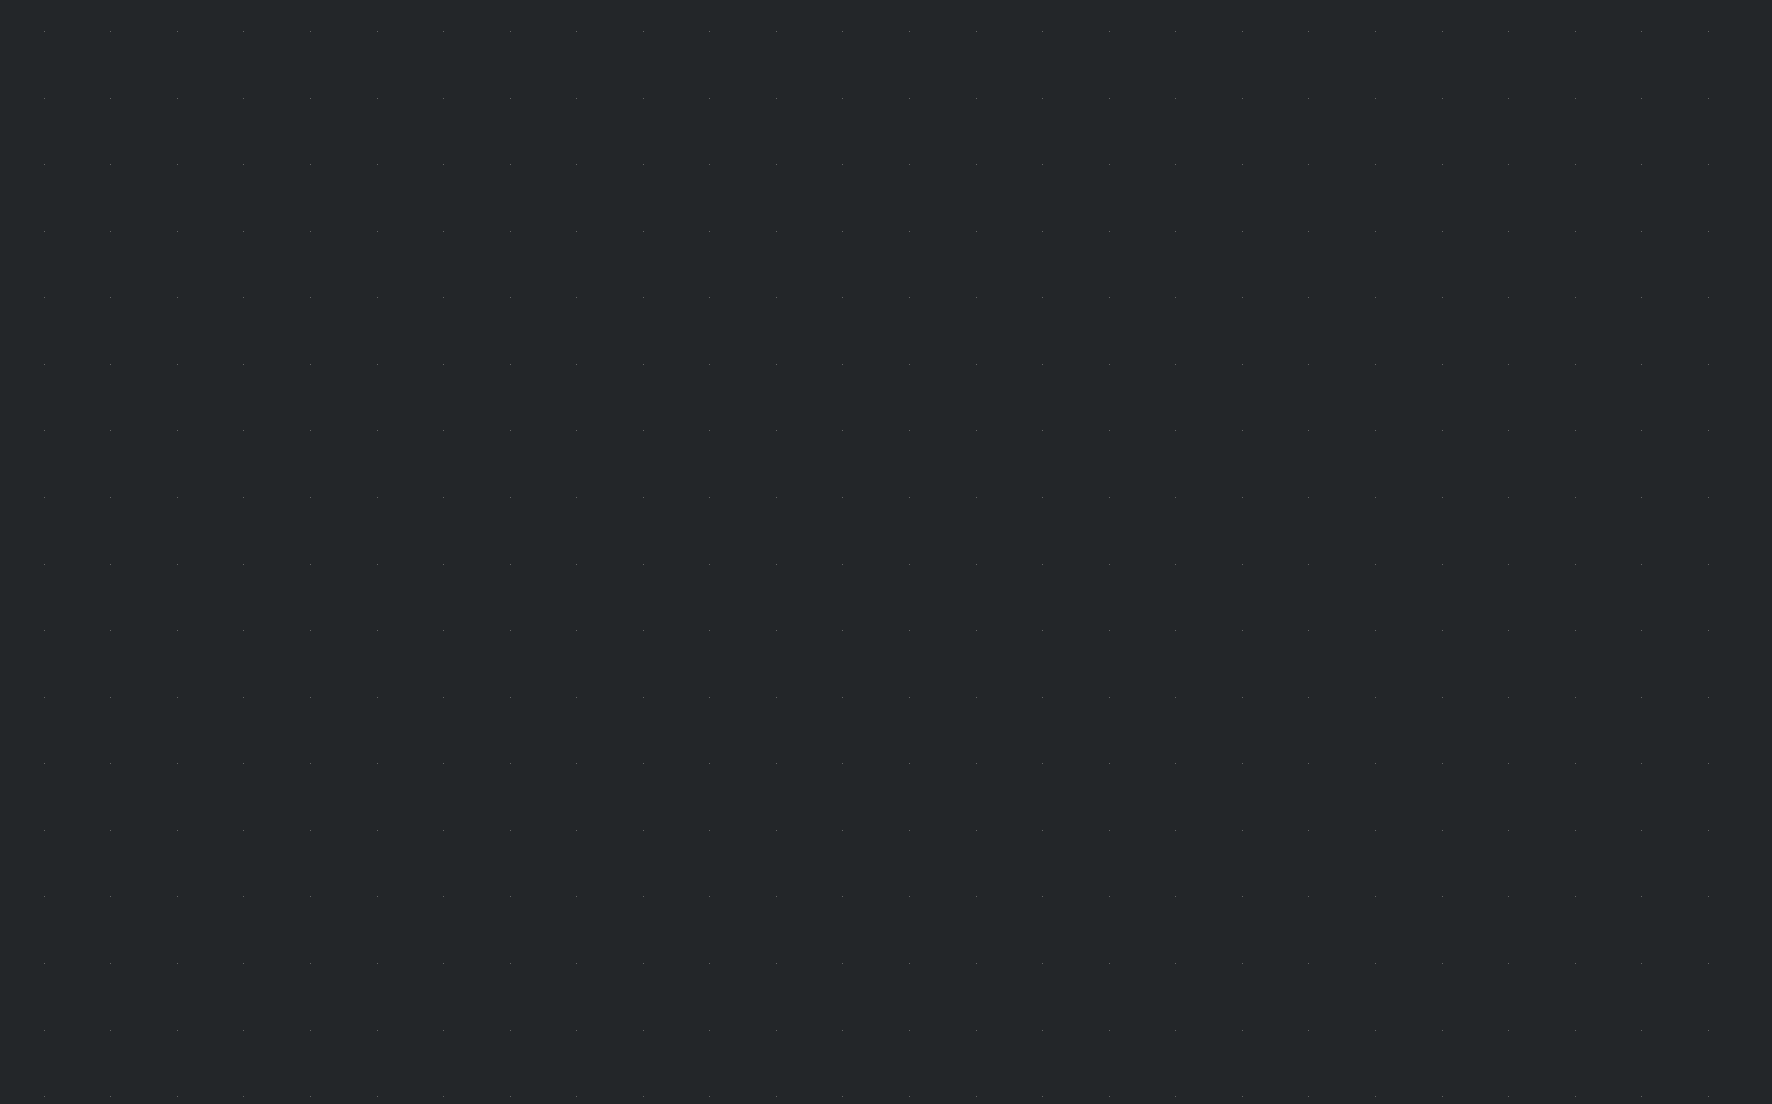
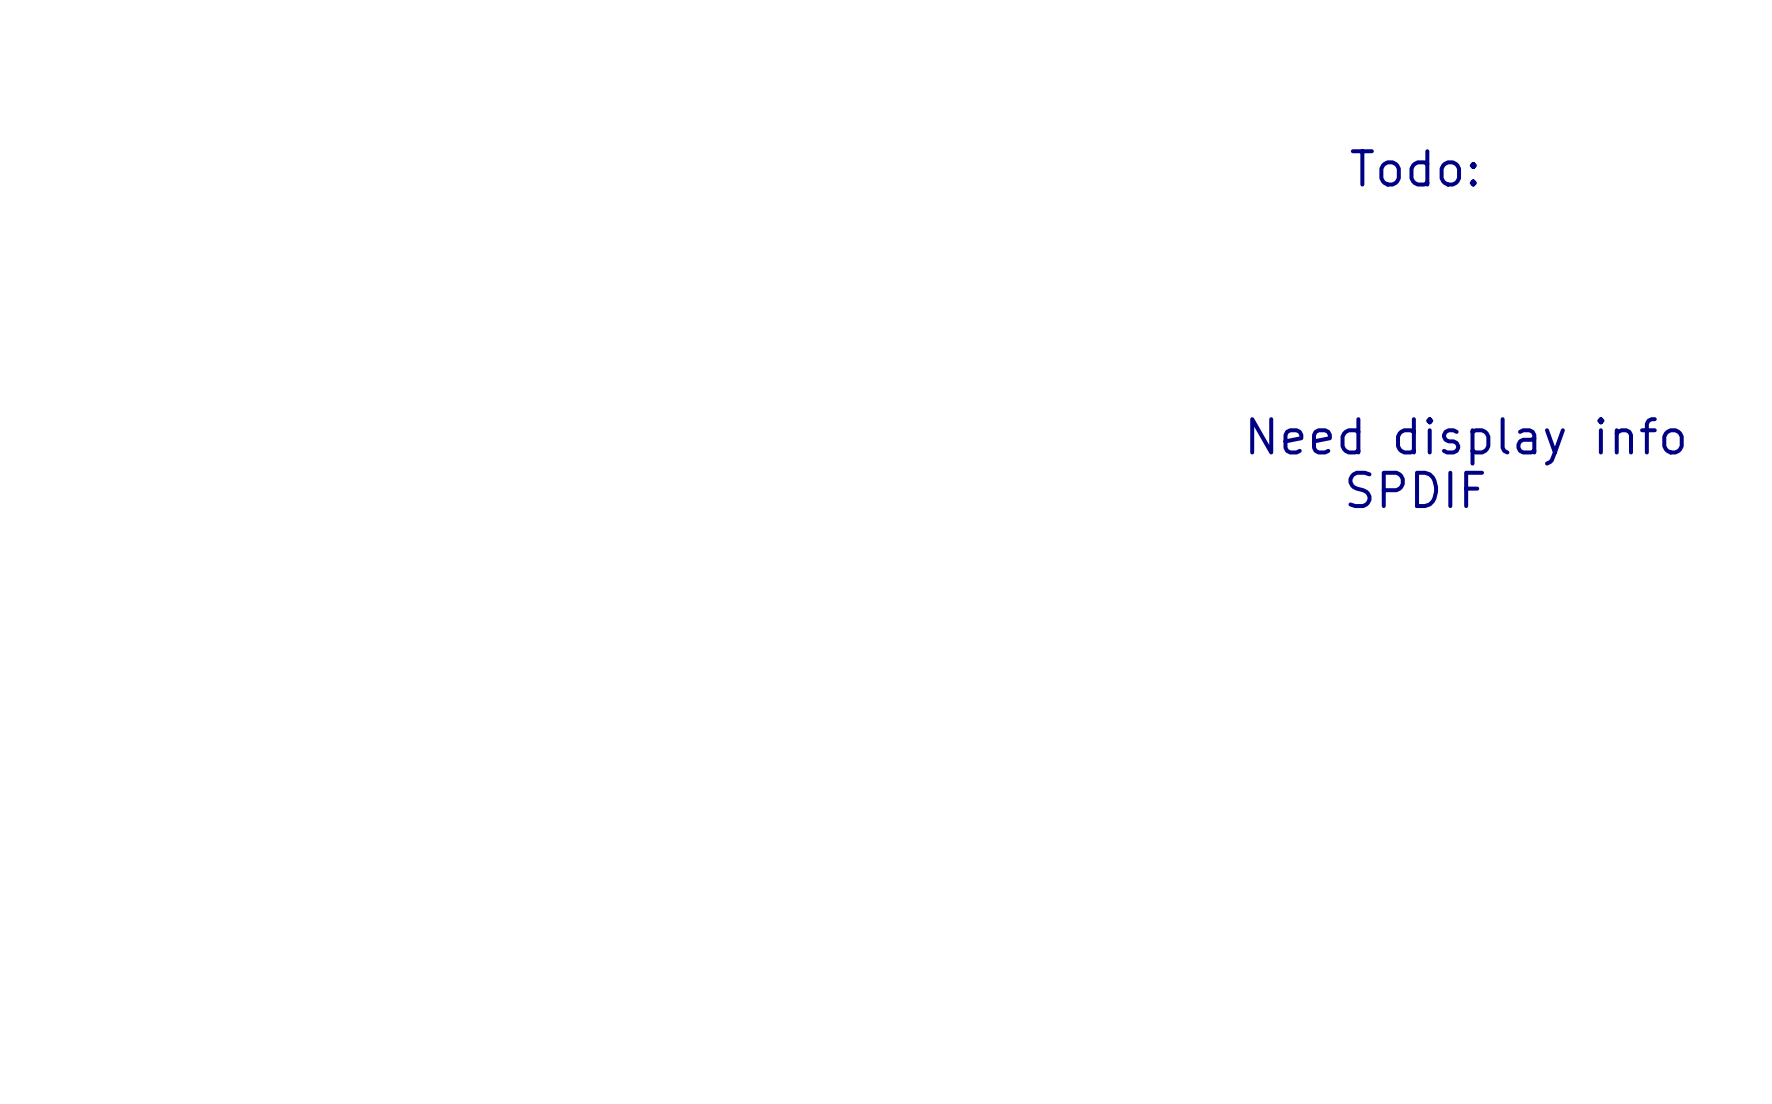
text: none -> Todo: (1413, 167)
text: none -> Need display info (1466, 441)
text: none -> SPDIF (1416, 489)

